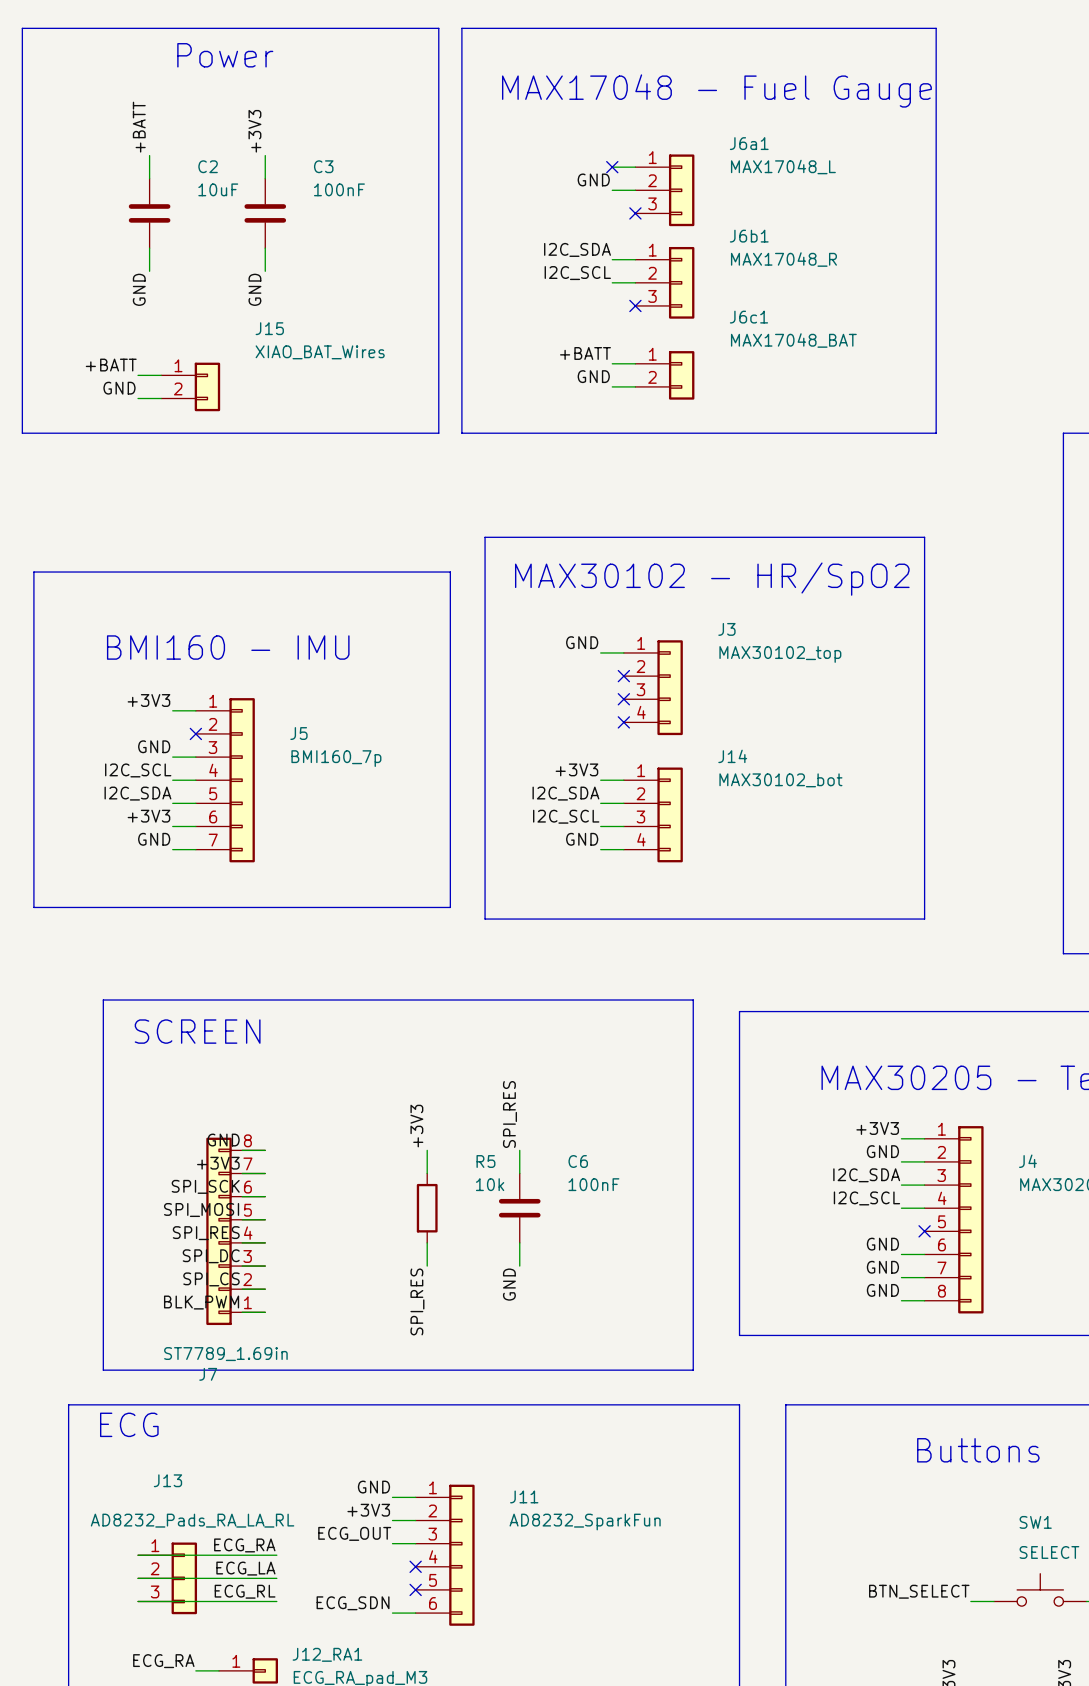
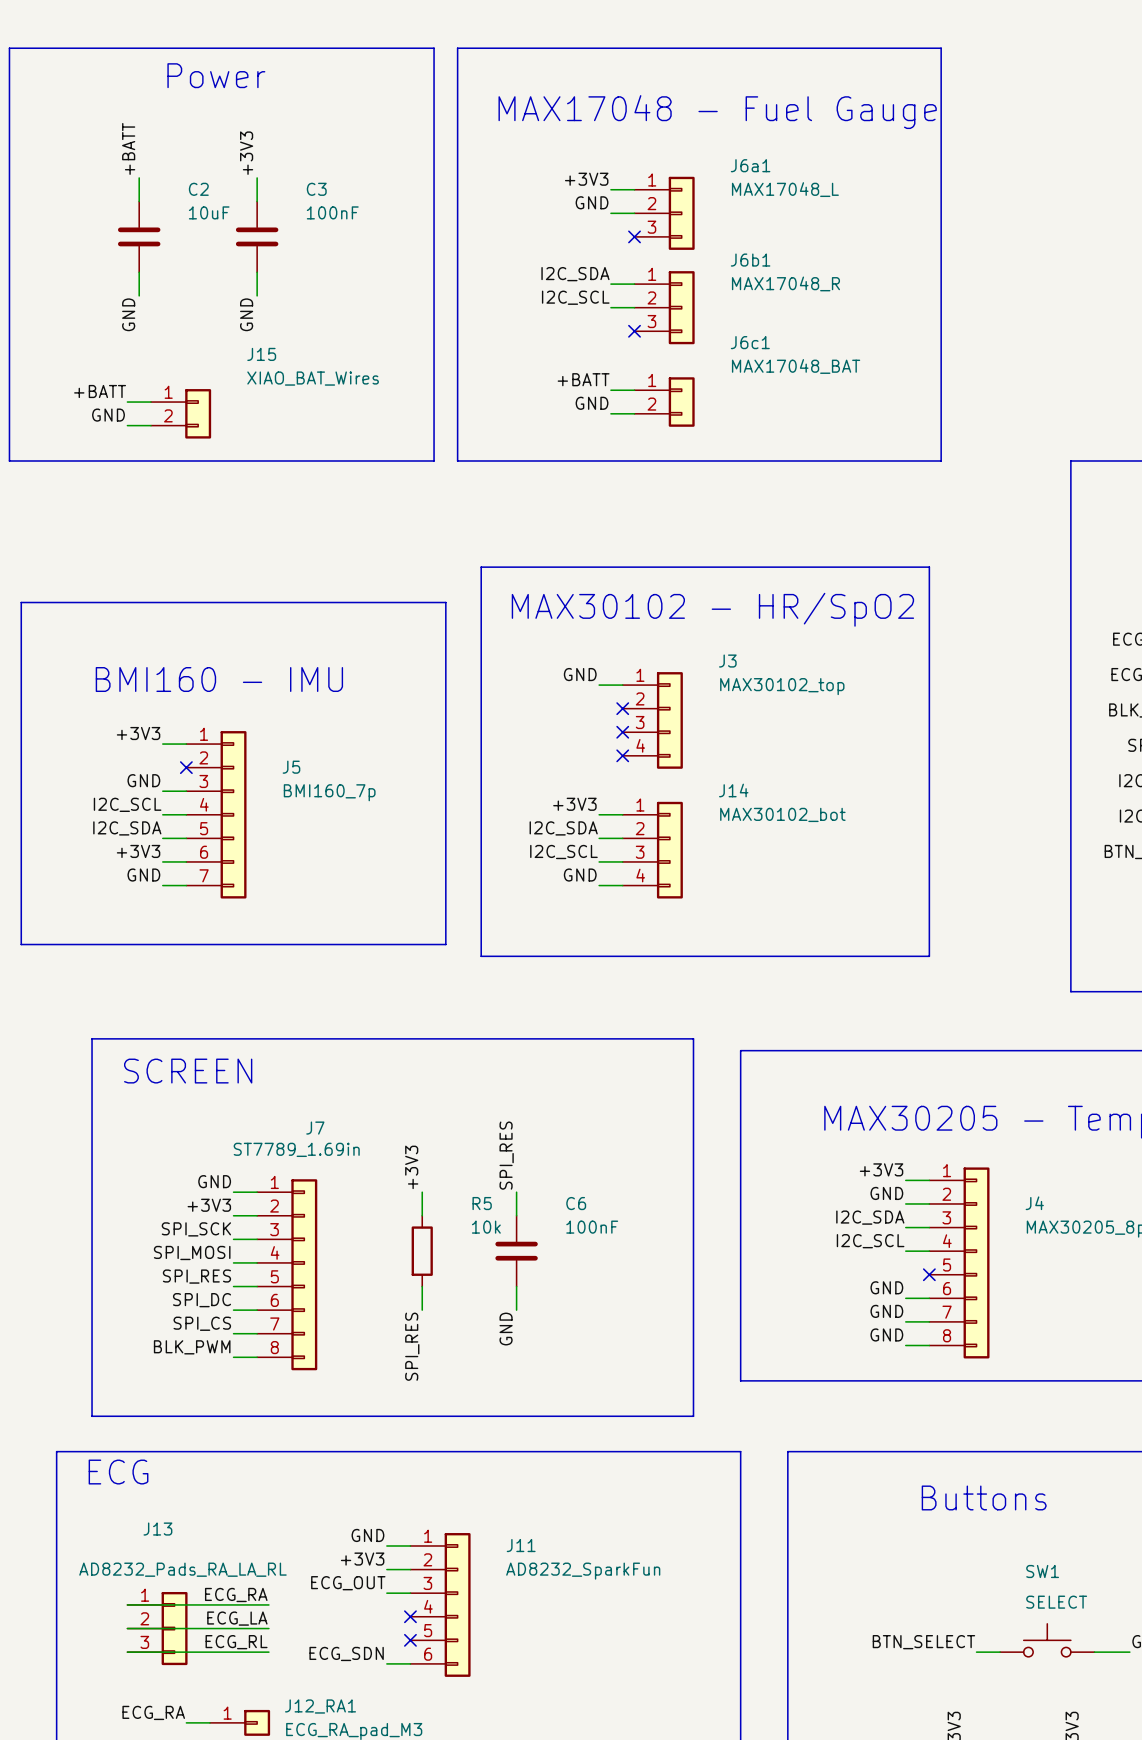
label: none -> +3V3 (586, 179)
no-connect mark: (612, 167) -> none
J7 rotation: 0° (219, 1231) -> 180° (304, 1274)

